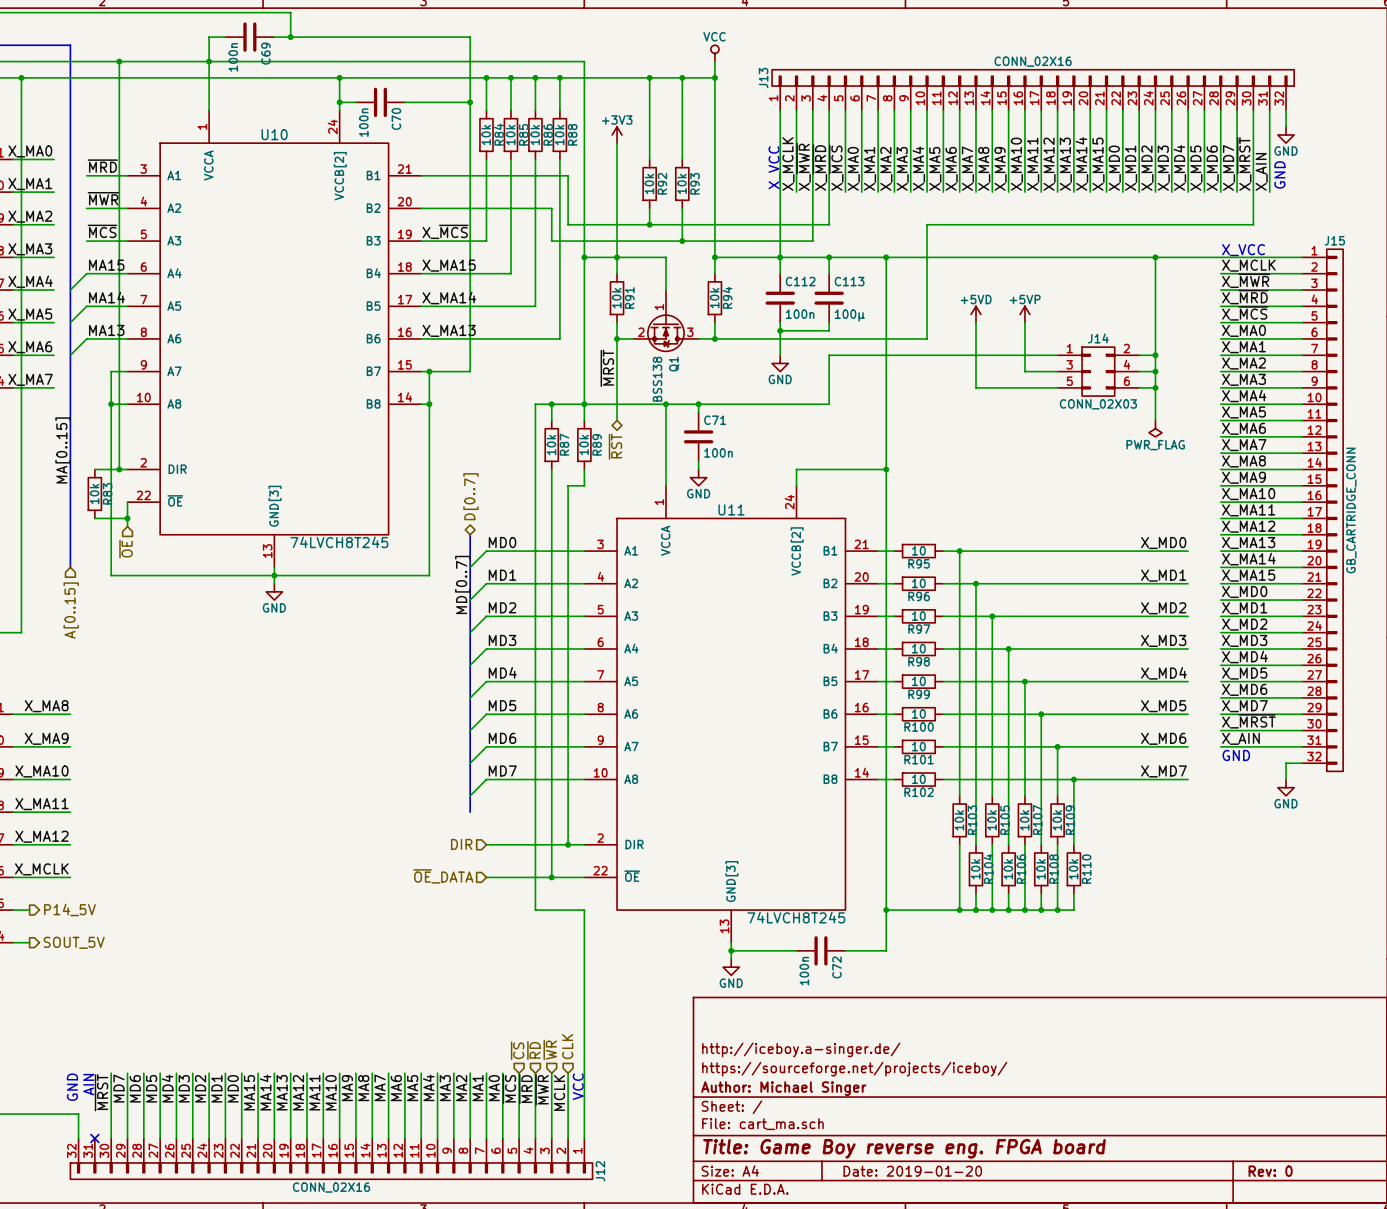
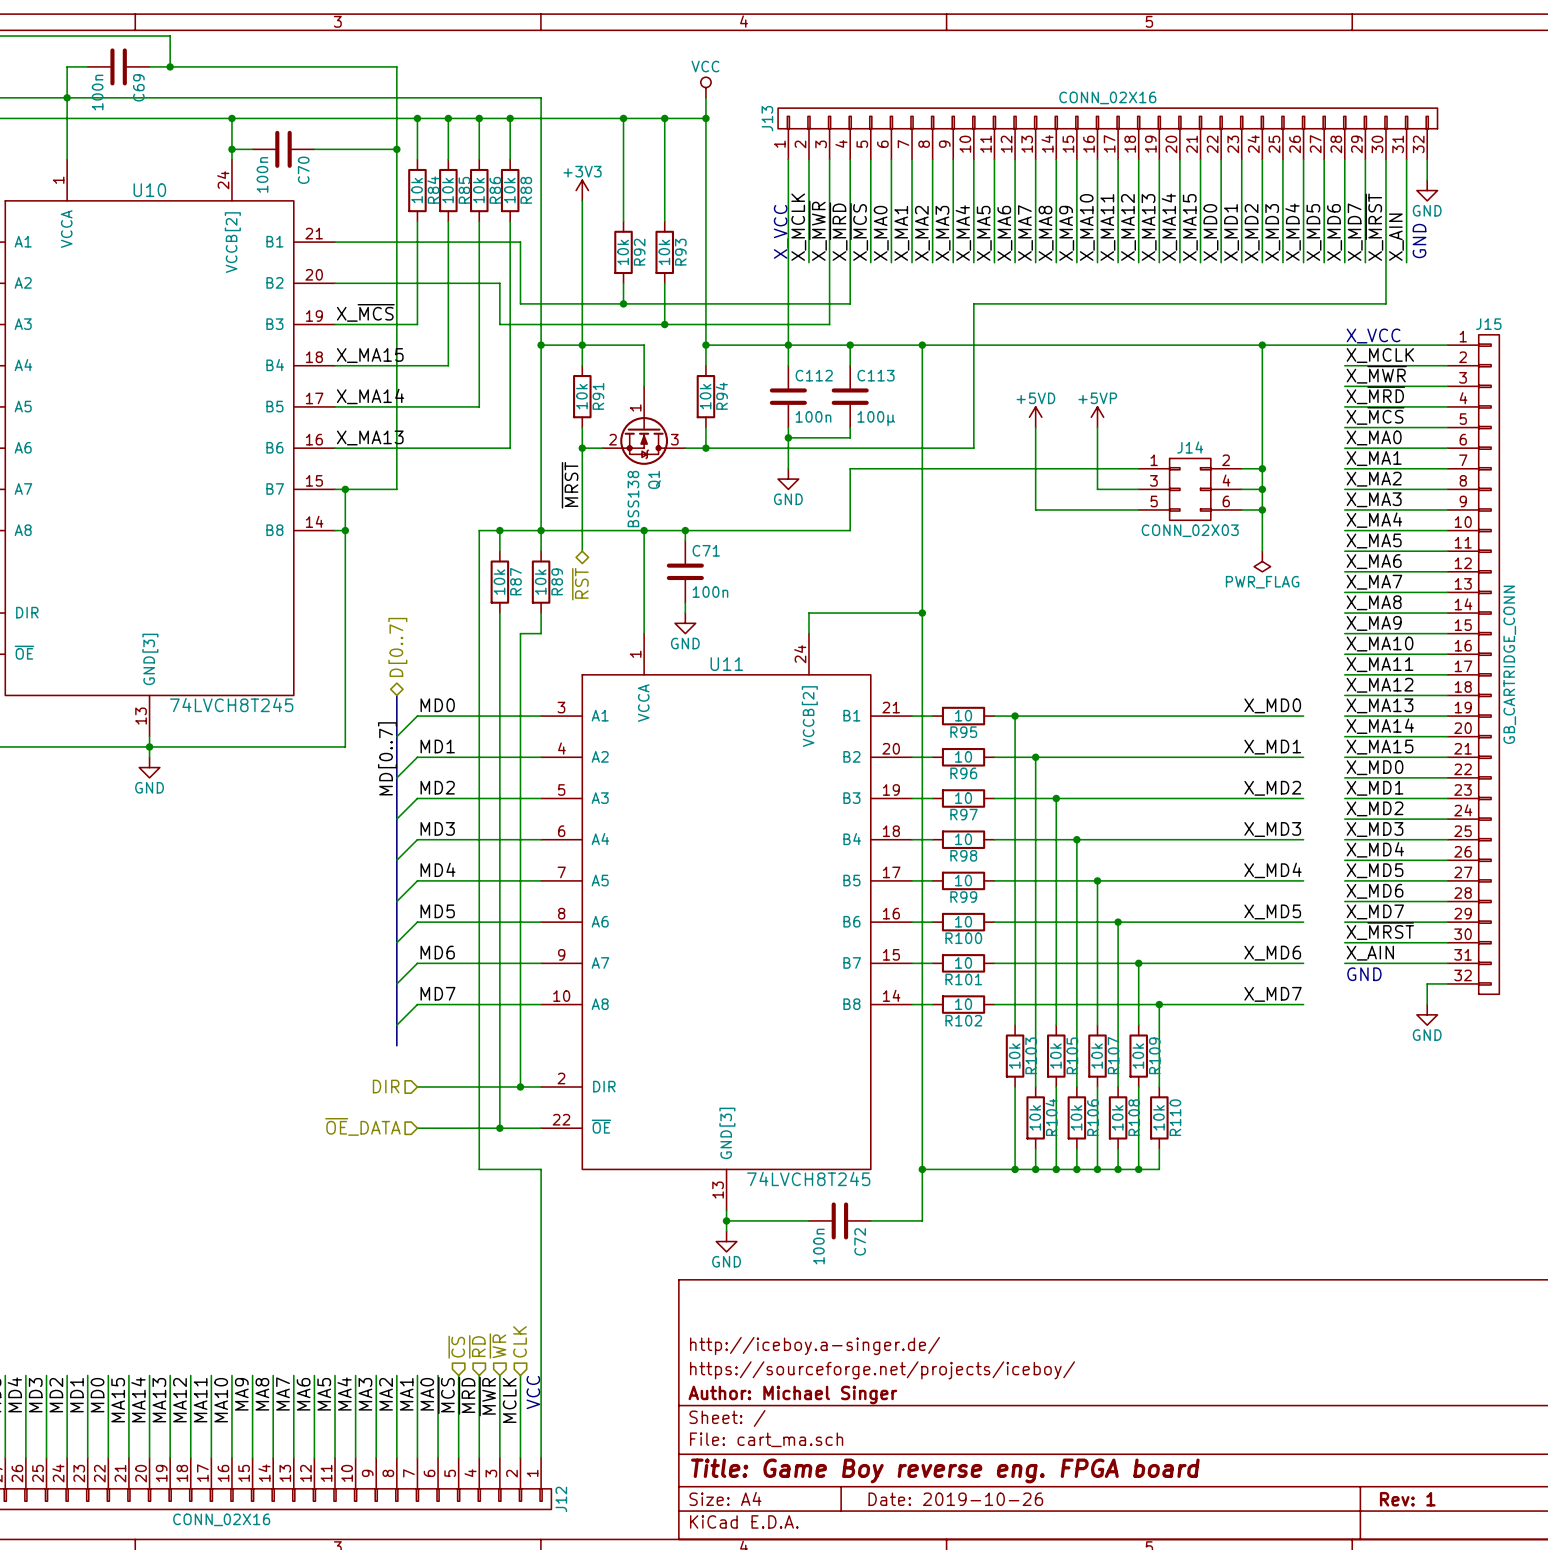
title block: Date: 2019-01-20 (912, 1171) -> Date: 2019-10-26 (955, 1499)
title block: Rev: 0 (1270, 1171) -> Rev: 1 (1407, 1499)

